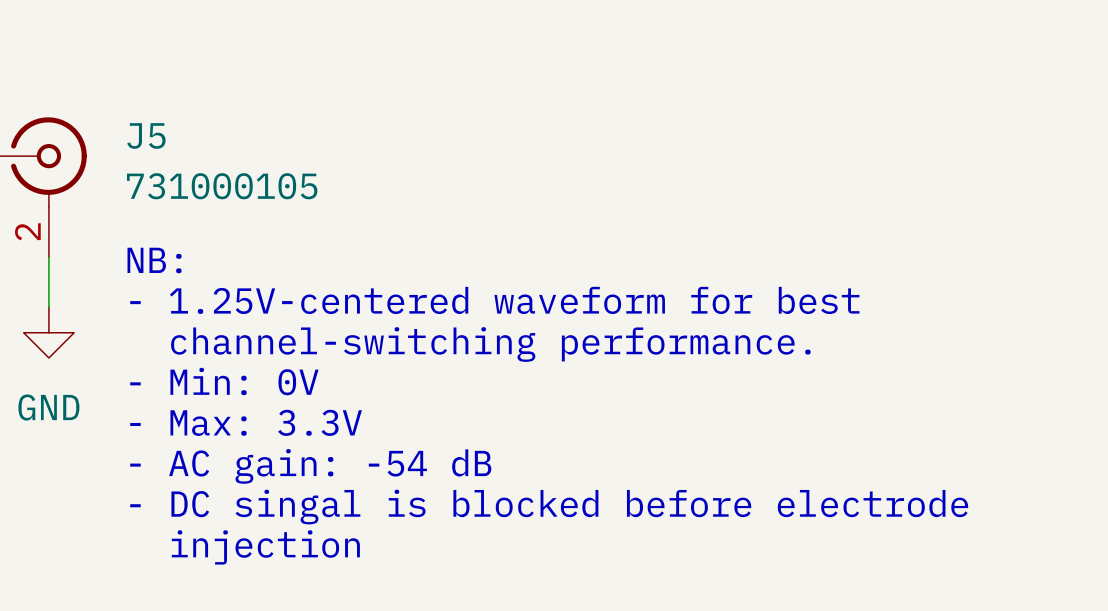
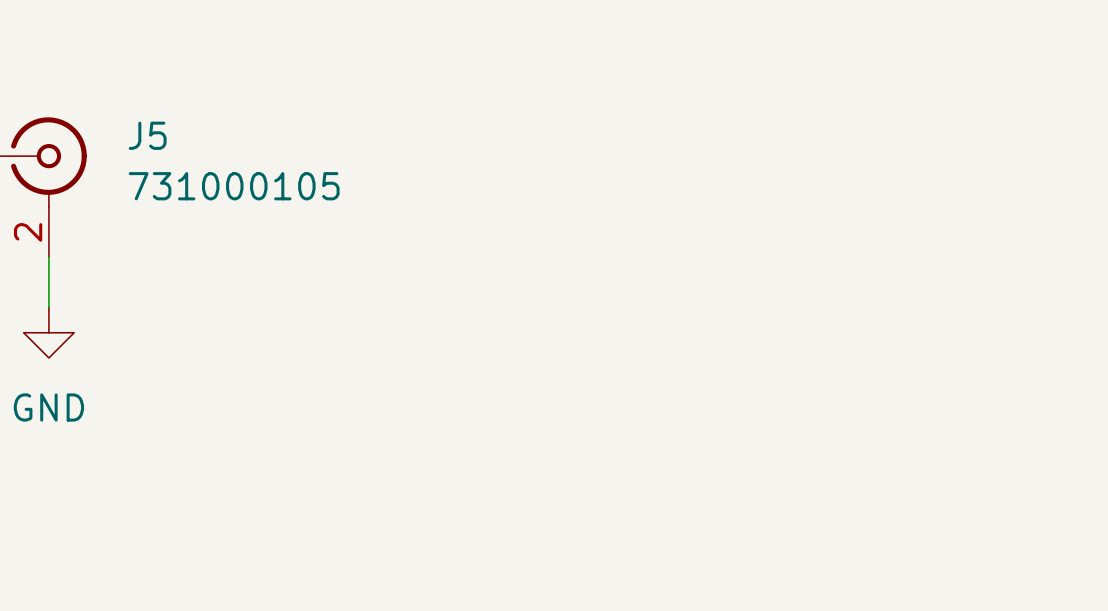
text: NB: (154, 260) -> none
text: - 1.25V-centered waveform for best (494, 300) -> none
text: channel-switching performance. (490, 344) -> none
text: - Min: 0V (224, 381) -> none
text: - Max: 3.3V (246, 422) -> none
text: - AC gain: -54 dB (310, 466) -> none
text: - DC singal is blocked before electrode (549, 507) -> none
text: injection (265, 547) -> none

